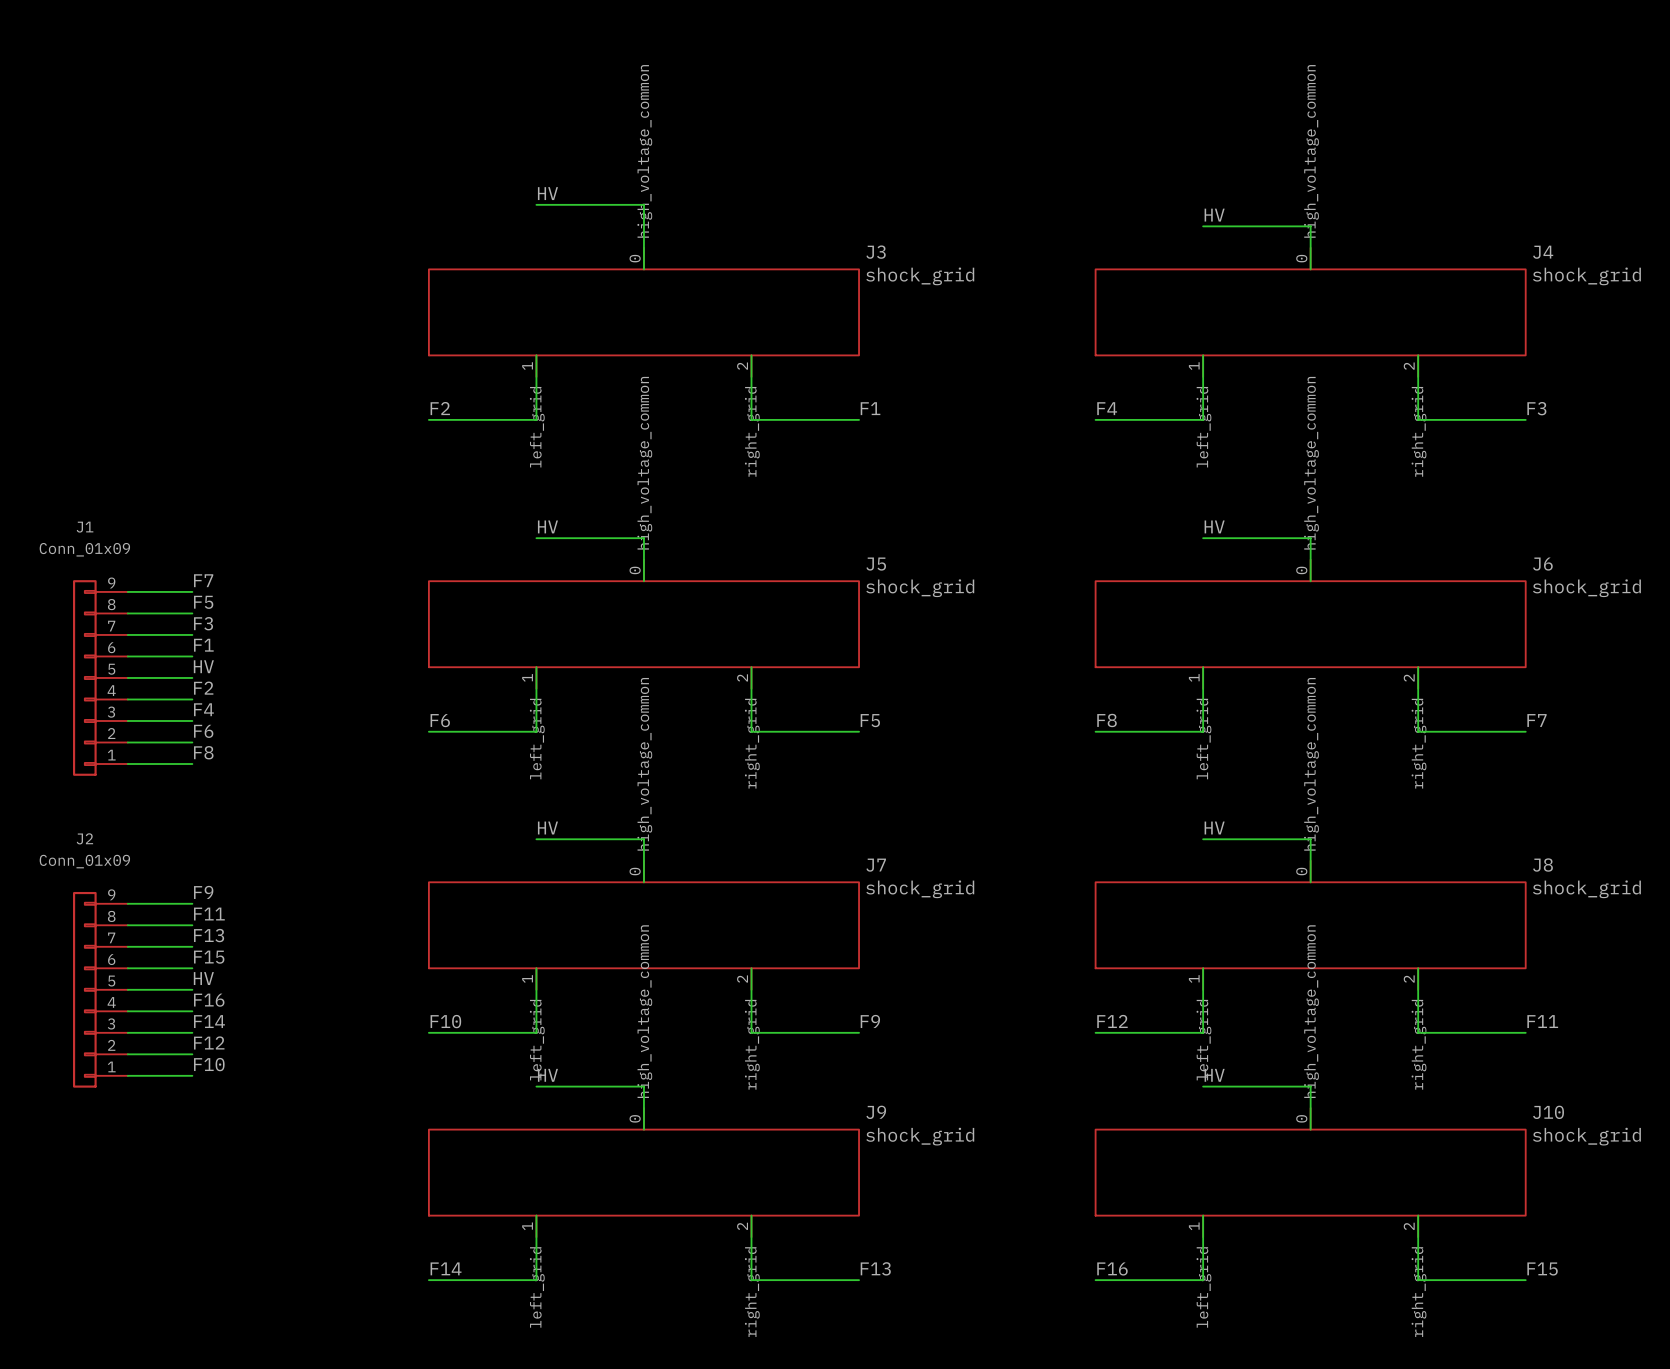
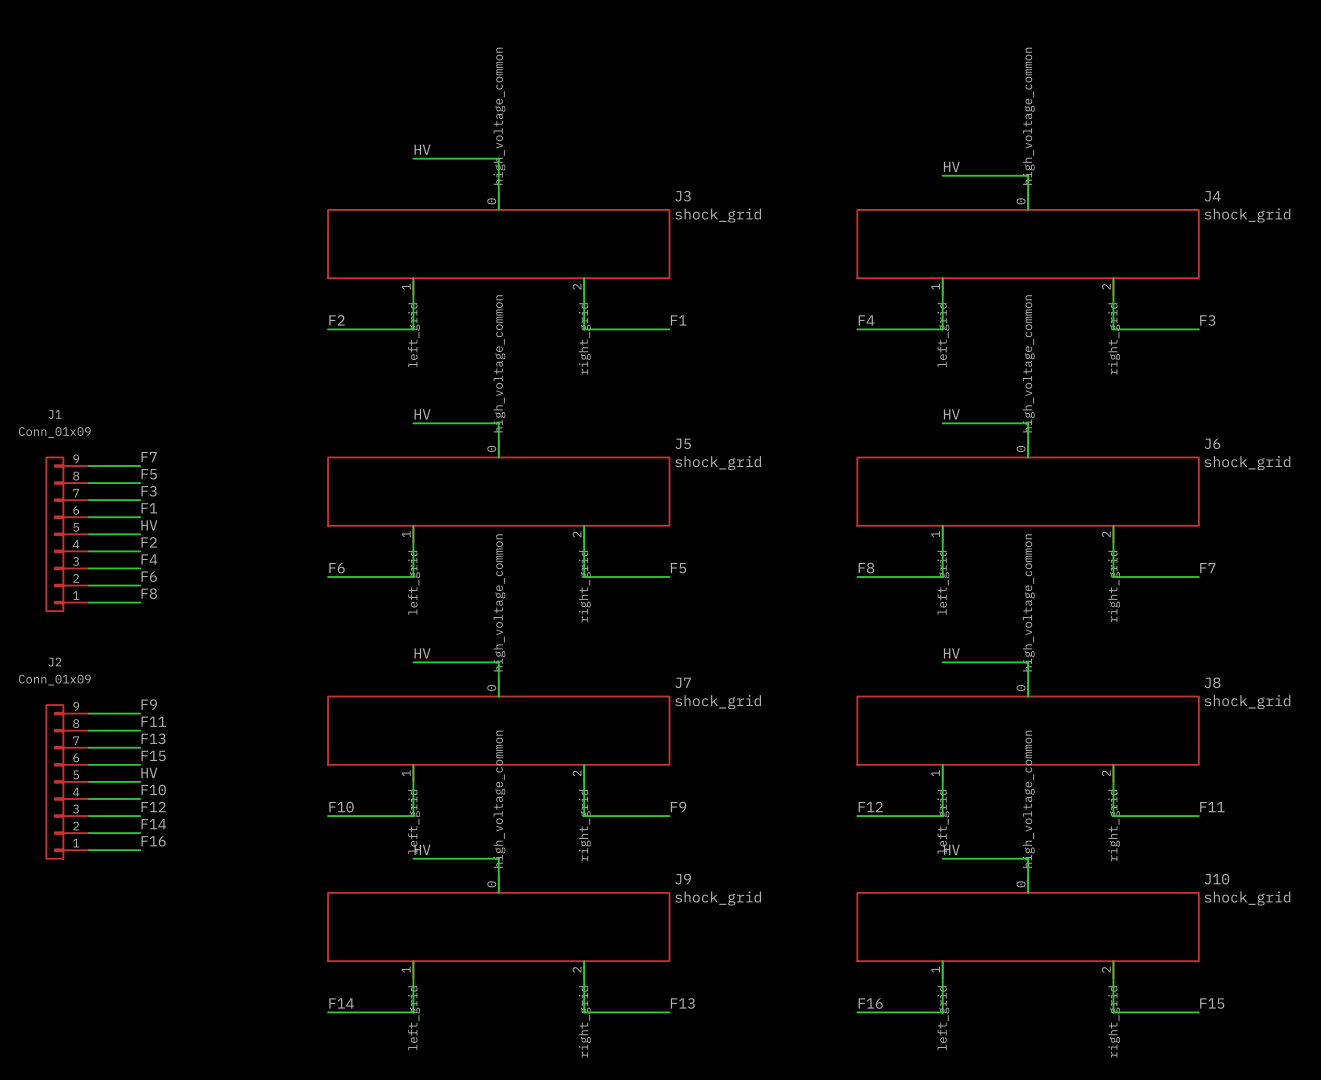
label: F16 (209, 1000) -> F10 (153, 790)
label: F14 (209, 1021) -> F12 (153, 807)
label: F12 (209, 1042) -> F14 (153, 824)
label: F10 (209, 1064) -> F16 (153, 841)

